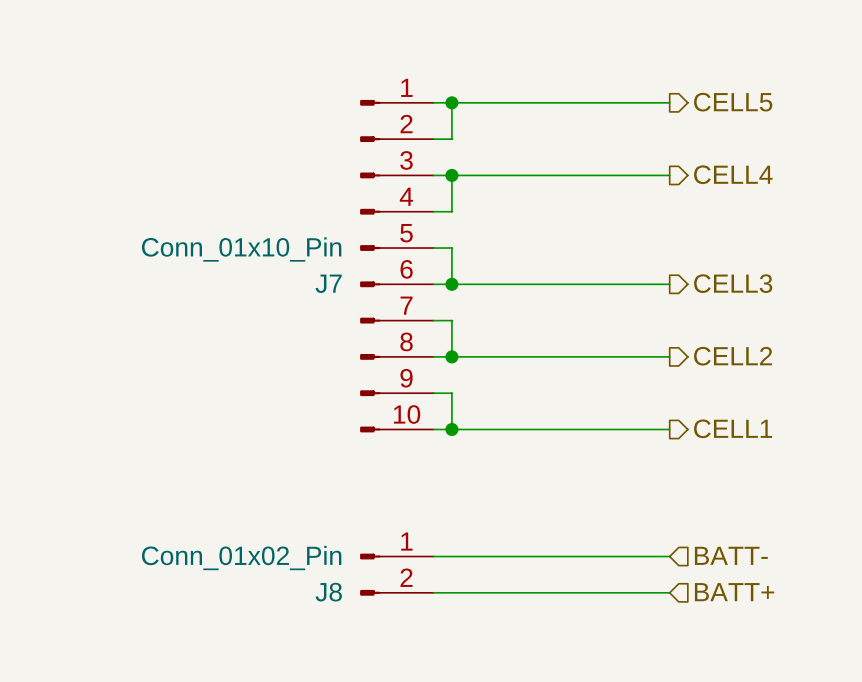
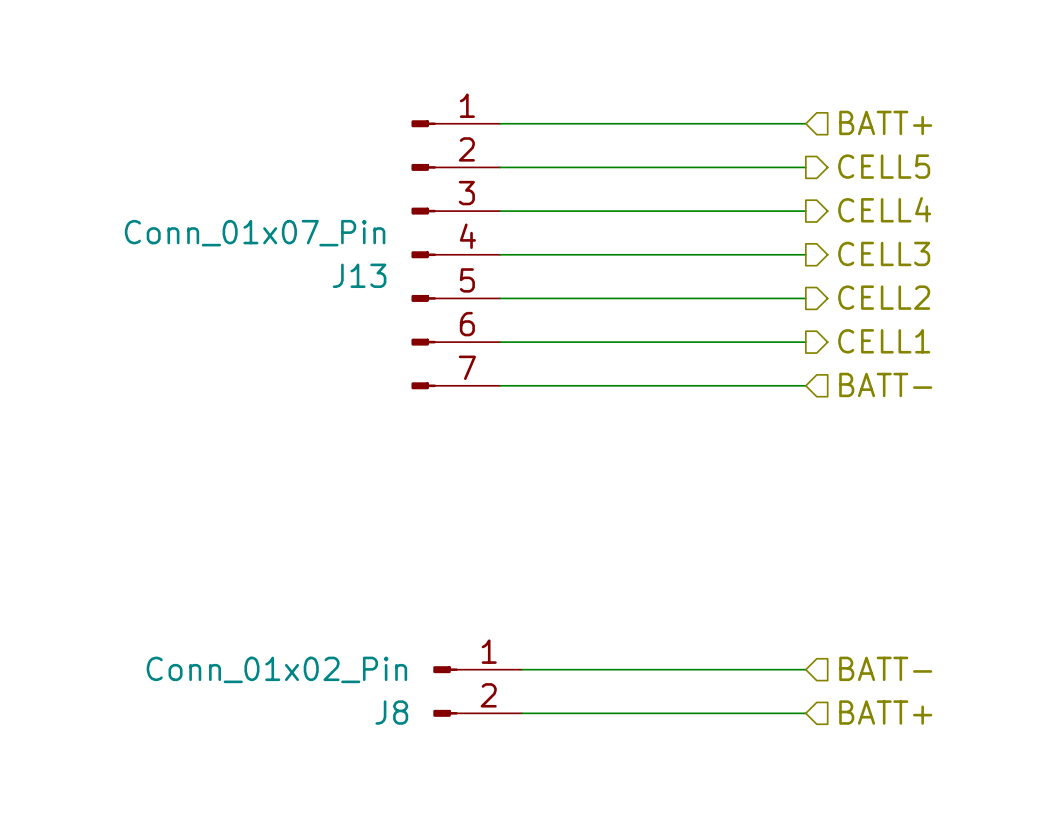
wire: (451, 102) (451, 139) -> (805, 167) (543, 167)
junction: (451, 102) -> none
hierarchical label shape: output (733, 102) -> input (885, 122)
hierarchical label: CELL5 (733, 102) -> BATT+ (885, 122)
hierarchical label: none -> CELL5 (884, 166)
wire: (451, 175) (451, 211) -> (805, 254) (543, 254)
junction: (451, 175) -> none
J13: none -> Conn_01x07_Pin (455, 254)
hierarchical label: none -> CELL3 (884, 253)
wire: (451, 248) (451, 284) -> (543, 298) (805, 298)
J7: Conn_01x10_Pin (396, 266) -> none
hierarchical label: CELL3 (733, 283) -> CELL1 (884, 341)
junction: (451, 284) -> none
hierarchical label: none -> BATT- (885, 384)
wire: (451, 320) (451, 356) -> (543, 385) (805, 385)
wire: (433, 356) (669, 356) -> none
junction: (451, 356) -> none
hierarchical label position: CELL2 (733, 356) -> CELL2 (884, 297)
wire: (433, 393) (451, 393) (451, 429) -> none
hierarchical label: CELL1 (733, 428) -> none
wire: (433, 429) (669, 429) -> none
junction: (451, 429) -> none

